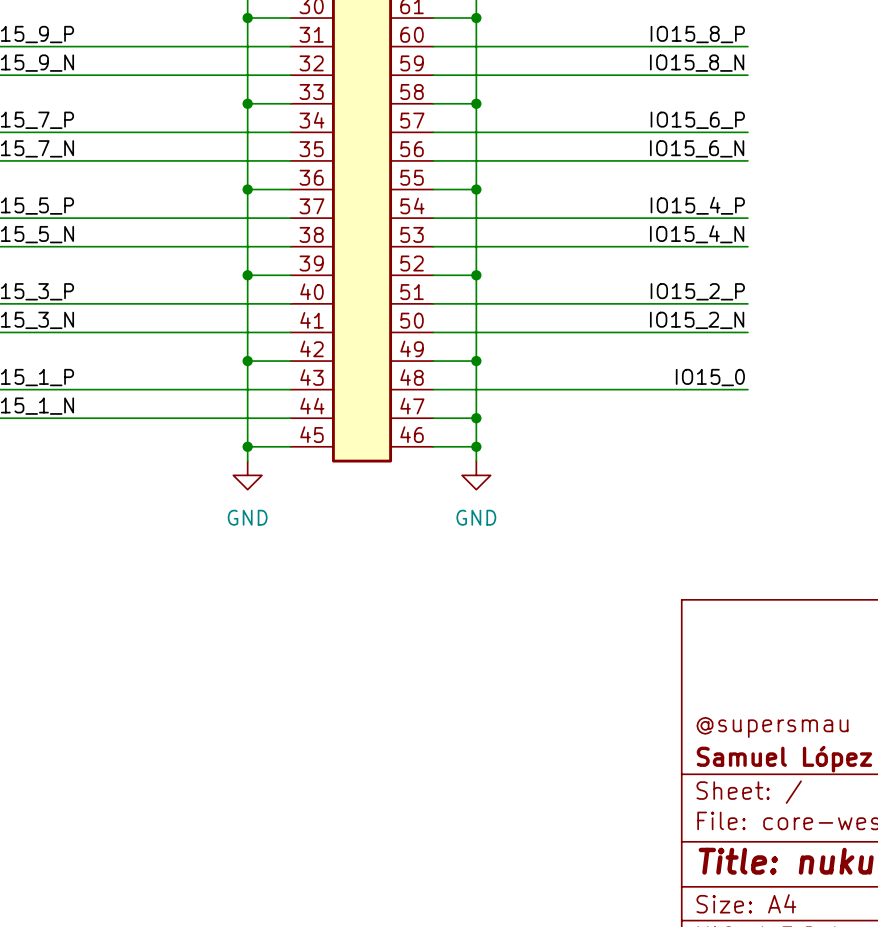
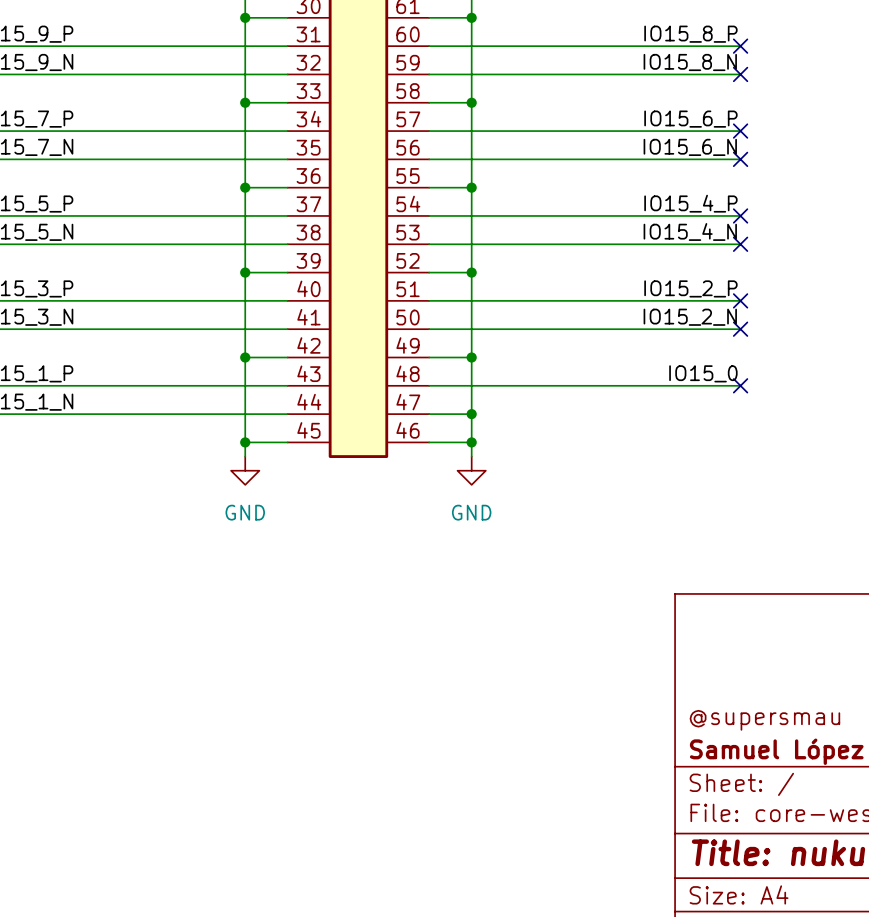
no-connect mark: none -> (740, 46)
no-connect mark: none -> (740, 74)
no-connect mark: none -> (740, 131)
no-connect mark: none -> (740, 159)
no-connect mark: none -> (740, 215)
no-connect mark: none -> (740, 244)
no-connect mark: none -> (740, 300)
no-connect mark: none -> (740, 329)
no-connect mark: none -> (740, 385)

